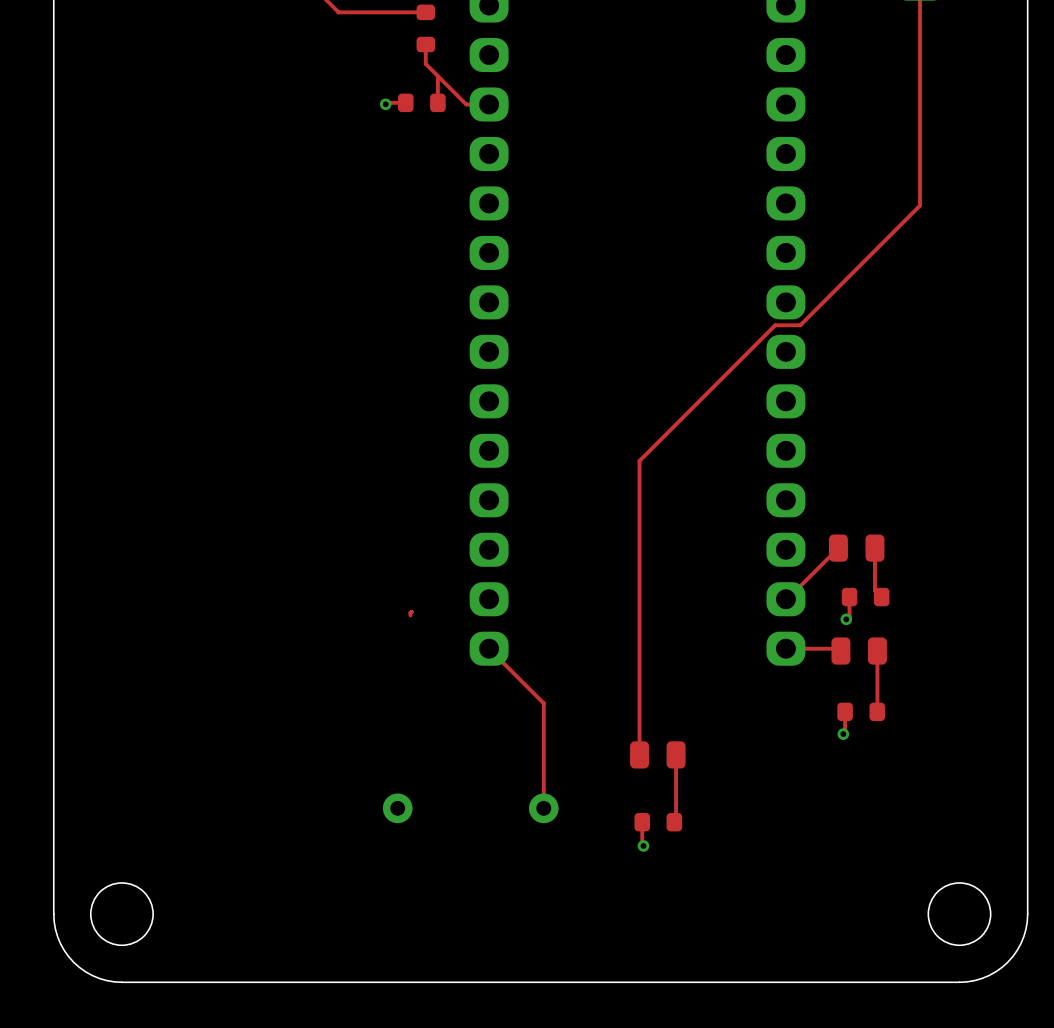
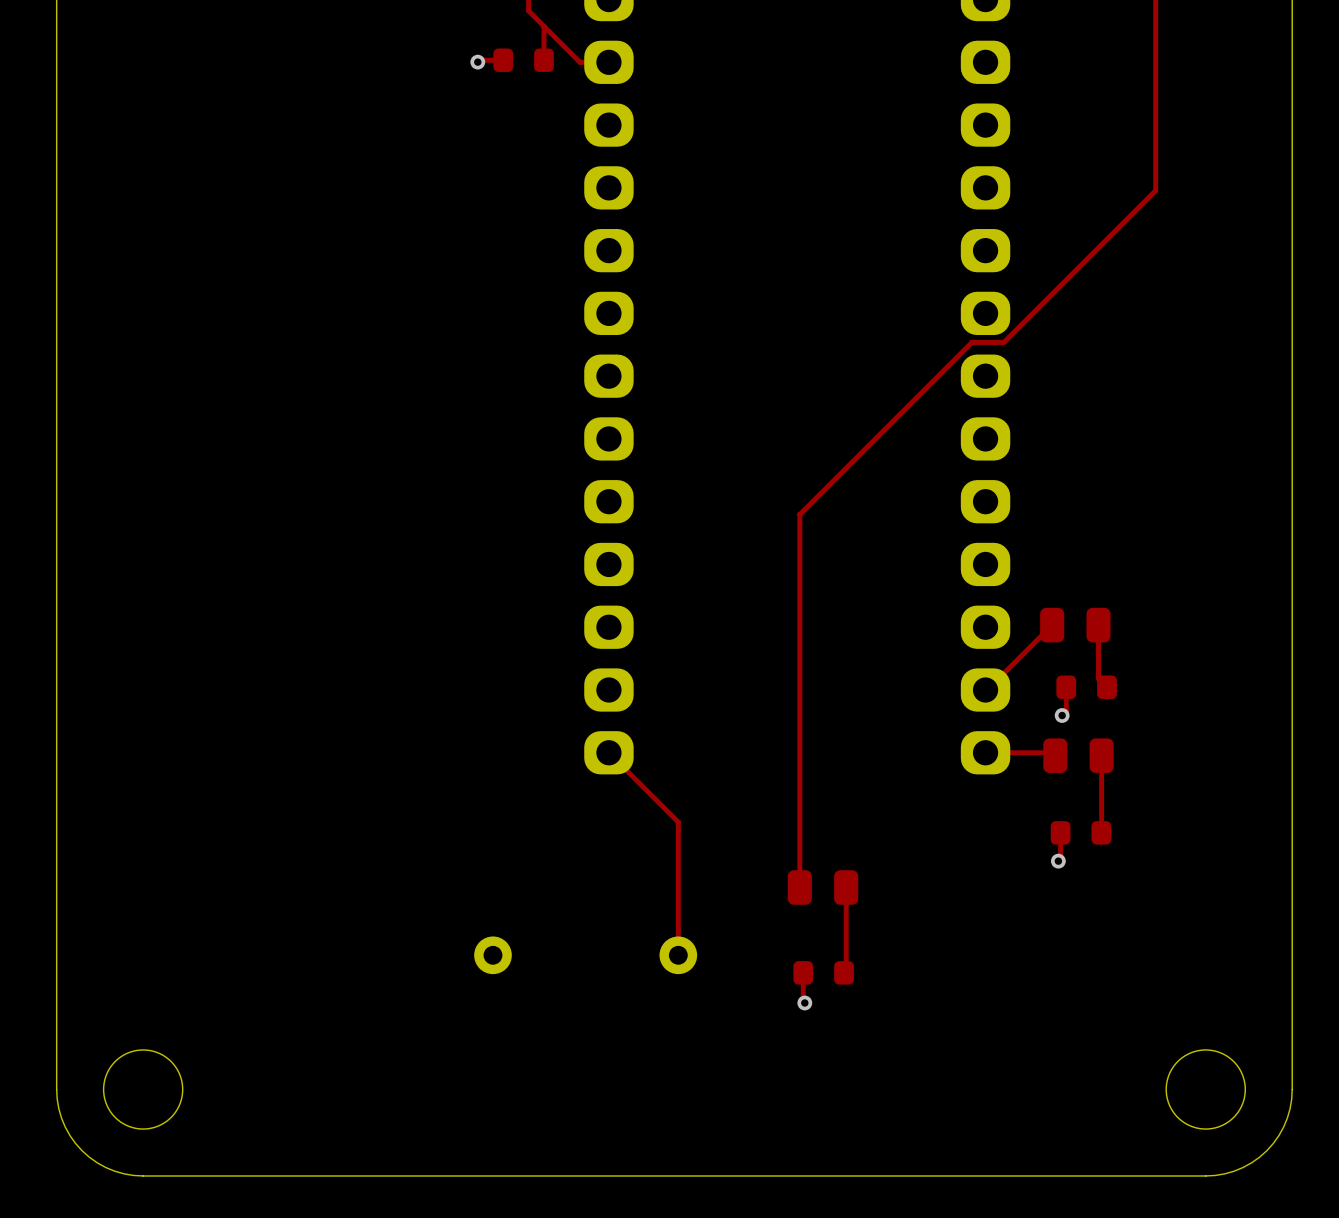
top track: (411, 611) (410, 615) -> none

